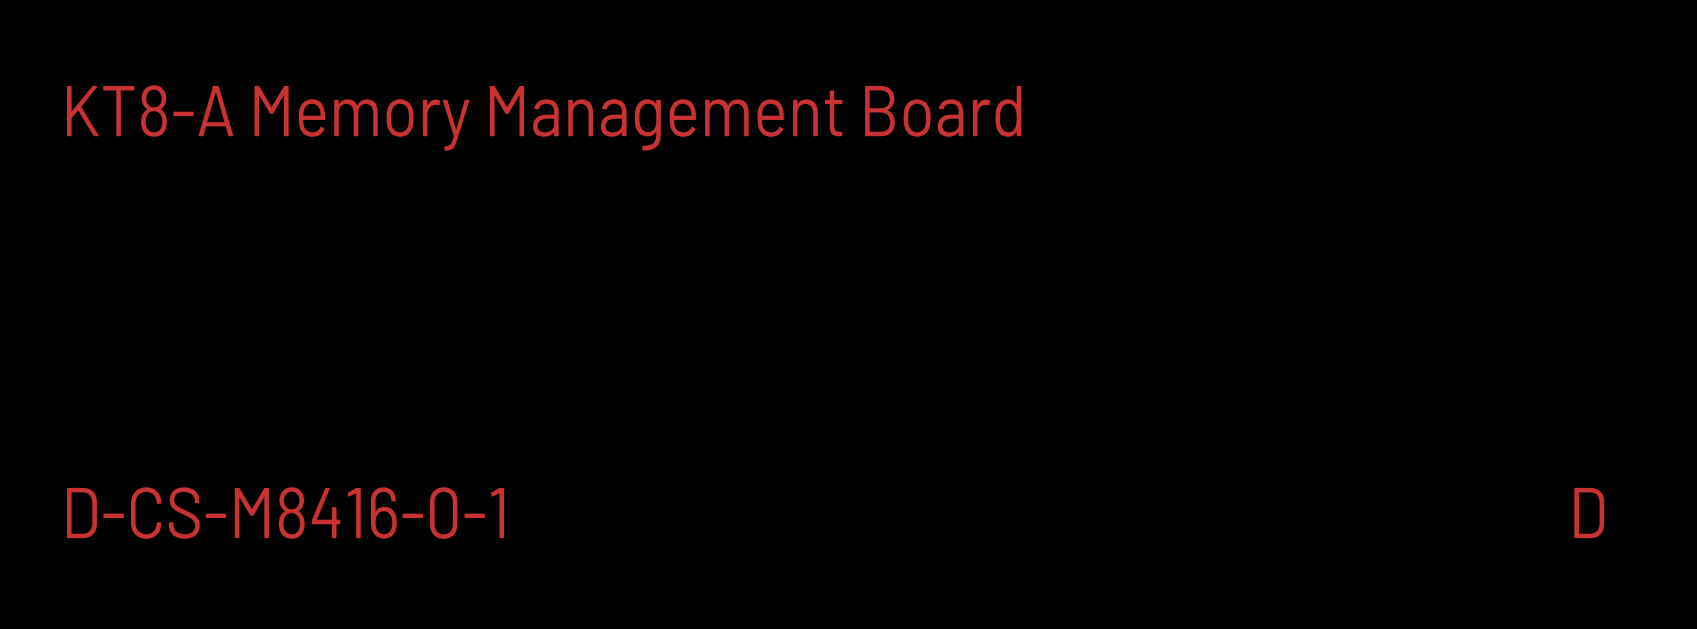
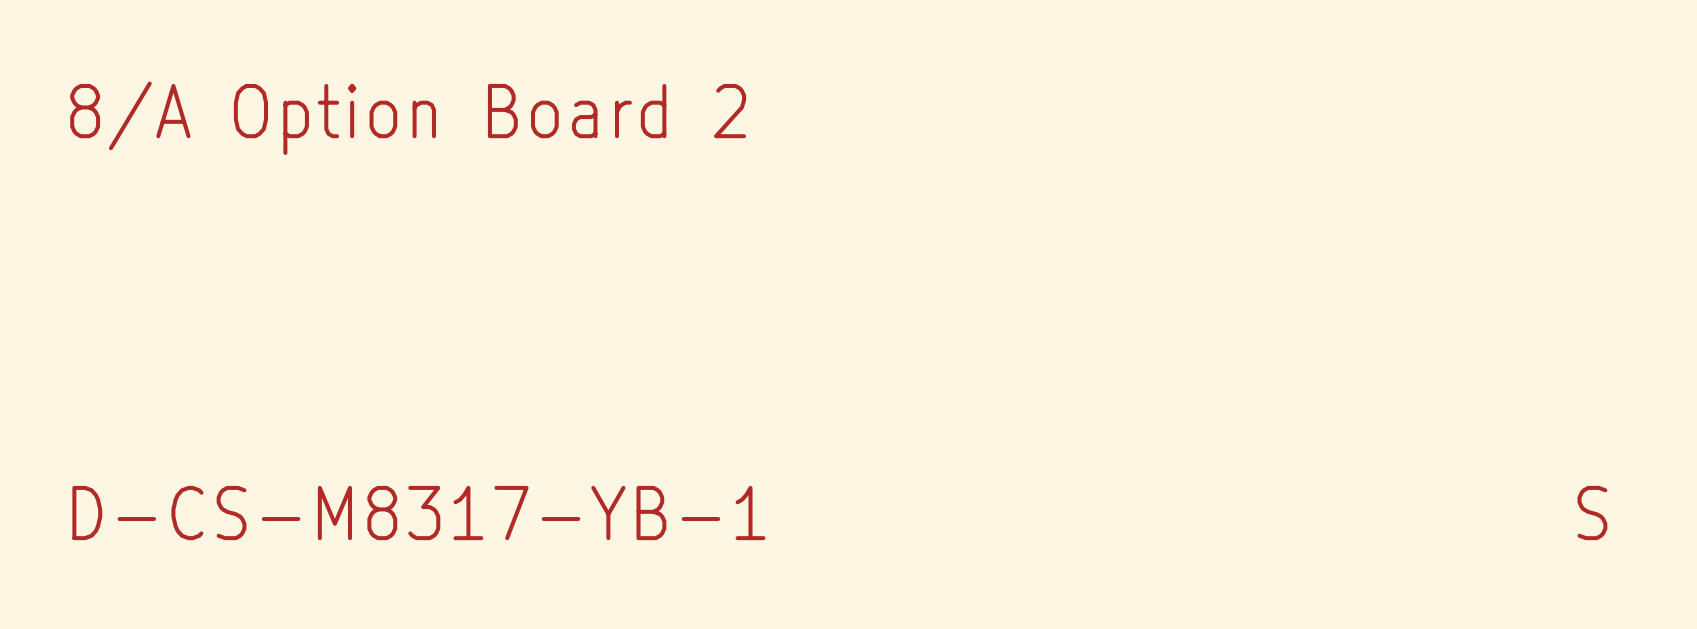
text: KT8-A Memory Management Board (544, 117) -> 8/A Option Board 2 (408, 118)
text: D-CS-M8416-0-1 (285, 513) -> D-CS-M8317-YB-1 (418, 513)
text: D (1589, 513) -> S (1592, 513)

